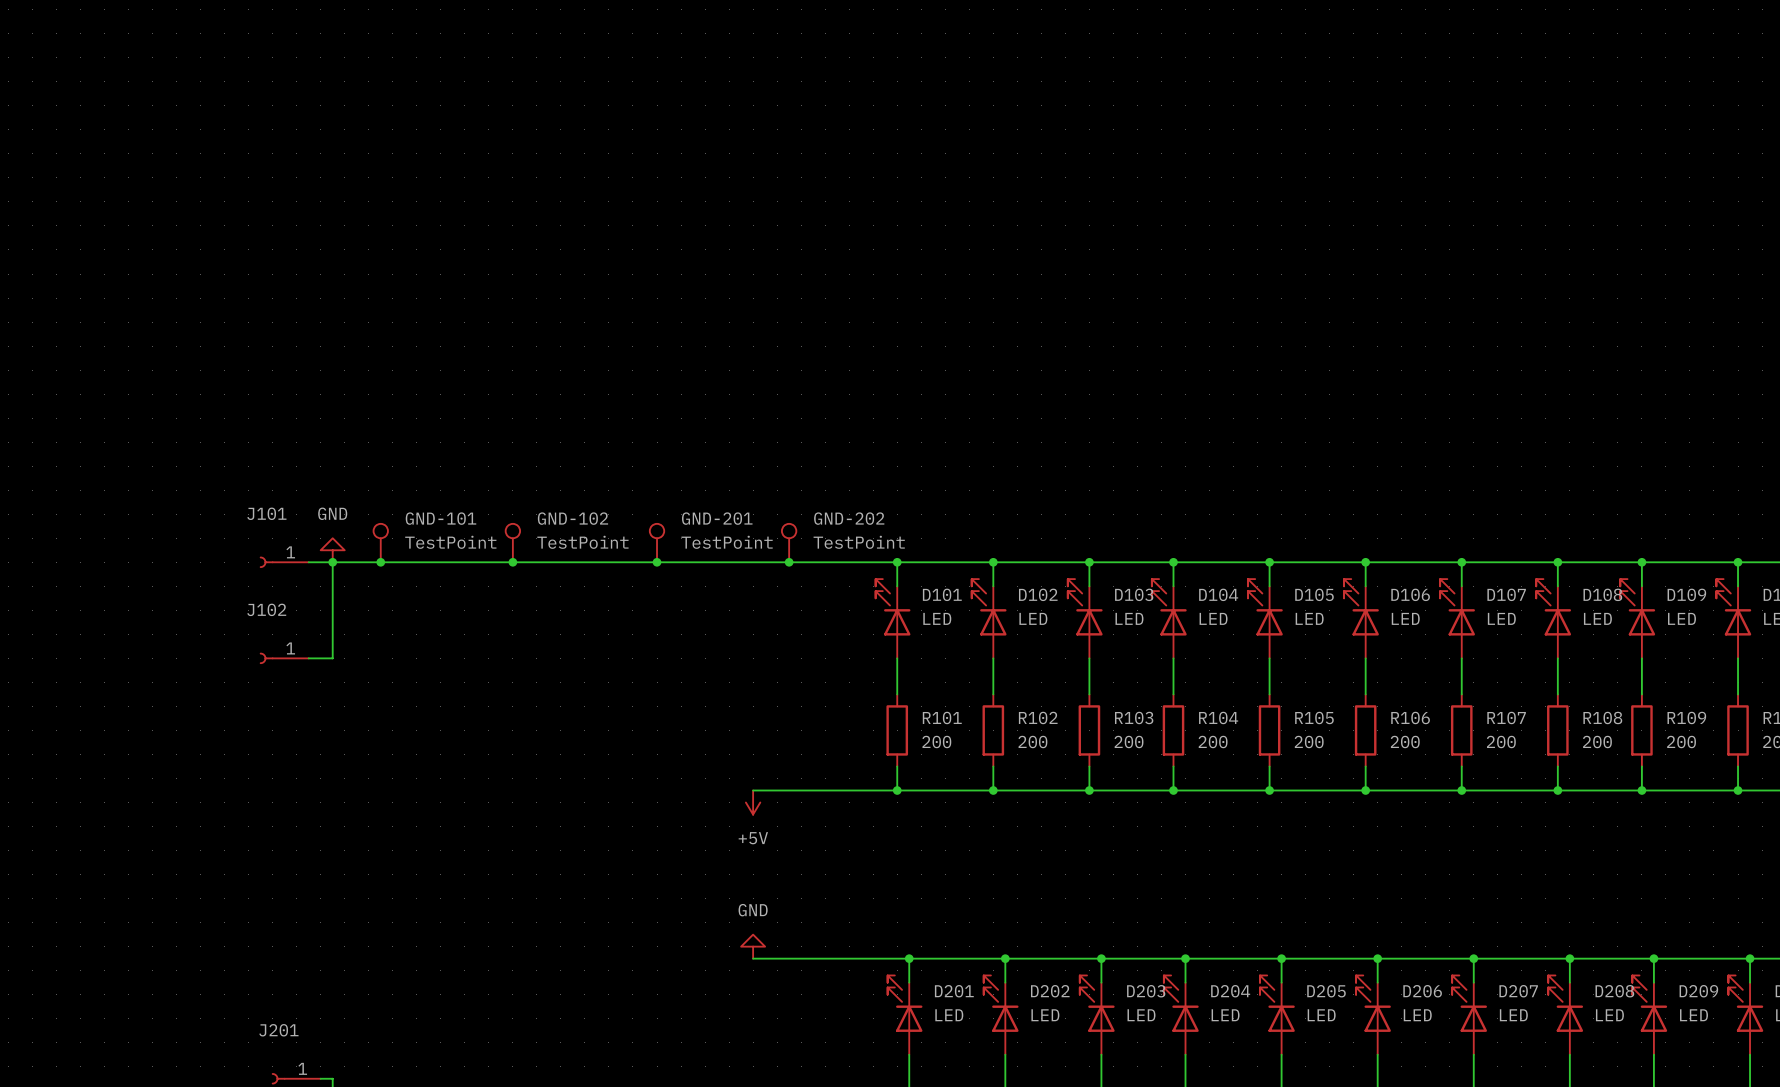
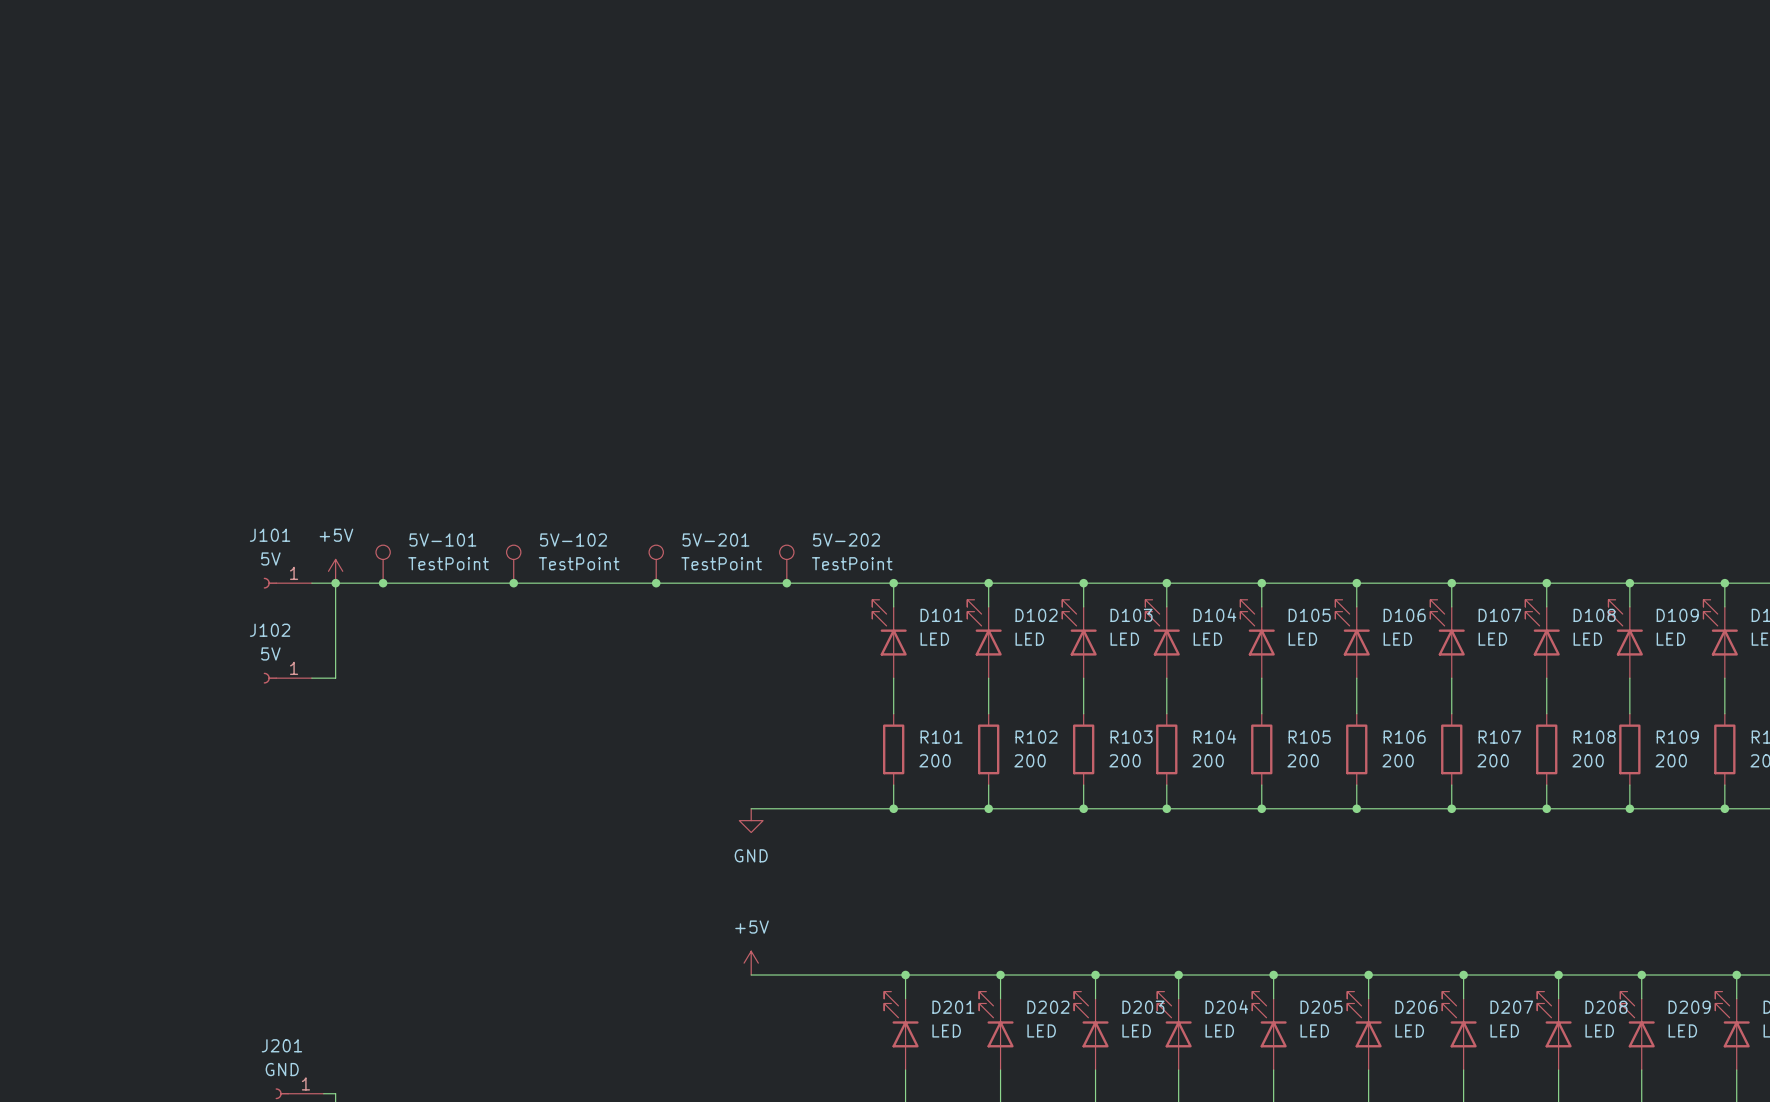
GND-101 name: GND-101 (440, 518) -> 5V-101 (442, 539)
GND-102 name: GND-102 (572, 518) -> 5V-102 (573, 539)
GND-201 name: GND-201 (717, 518) -> 5V-201 (715, 539)
GND-202 name: GND-202 (849, 518) -> 5V-202 (846, 539)
J101 value: none -> 5V (270, 558)
power symbol: GND (332, 550) -> +5V (335, 571)
J102 value: none -> 5V (270, 653)
power symbol: +5V (753, 802) -> GND (751, 820)
power symbol: GND (753, 946) -> +5V (751, 963)
J201 value: none -> GND (282, 1069)

